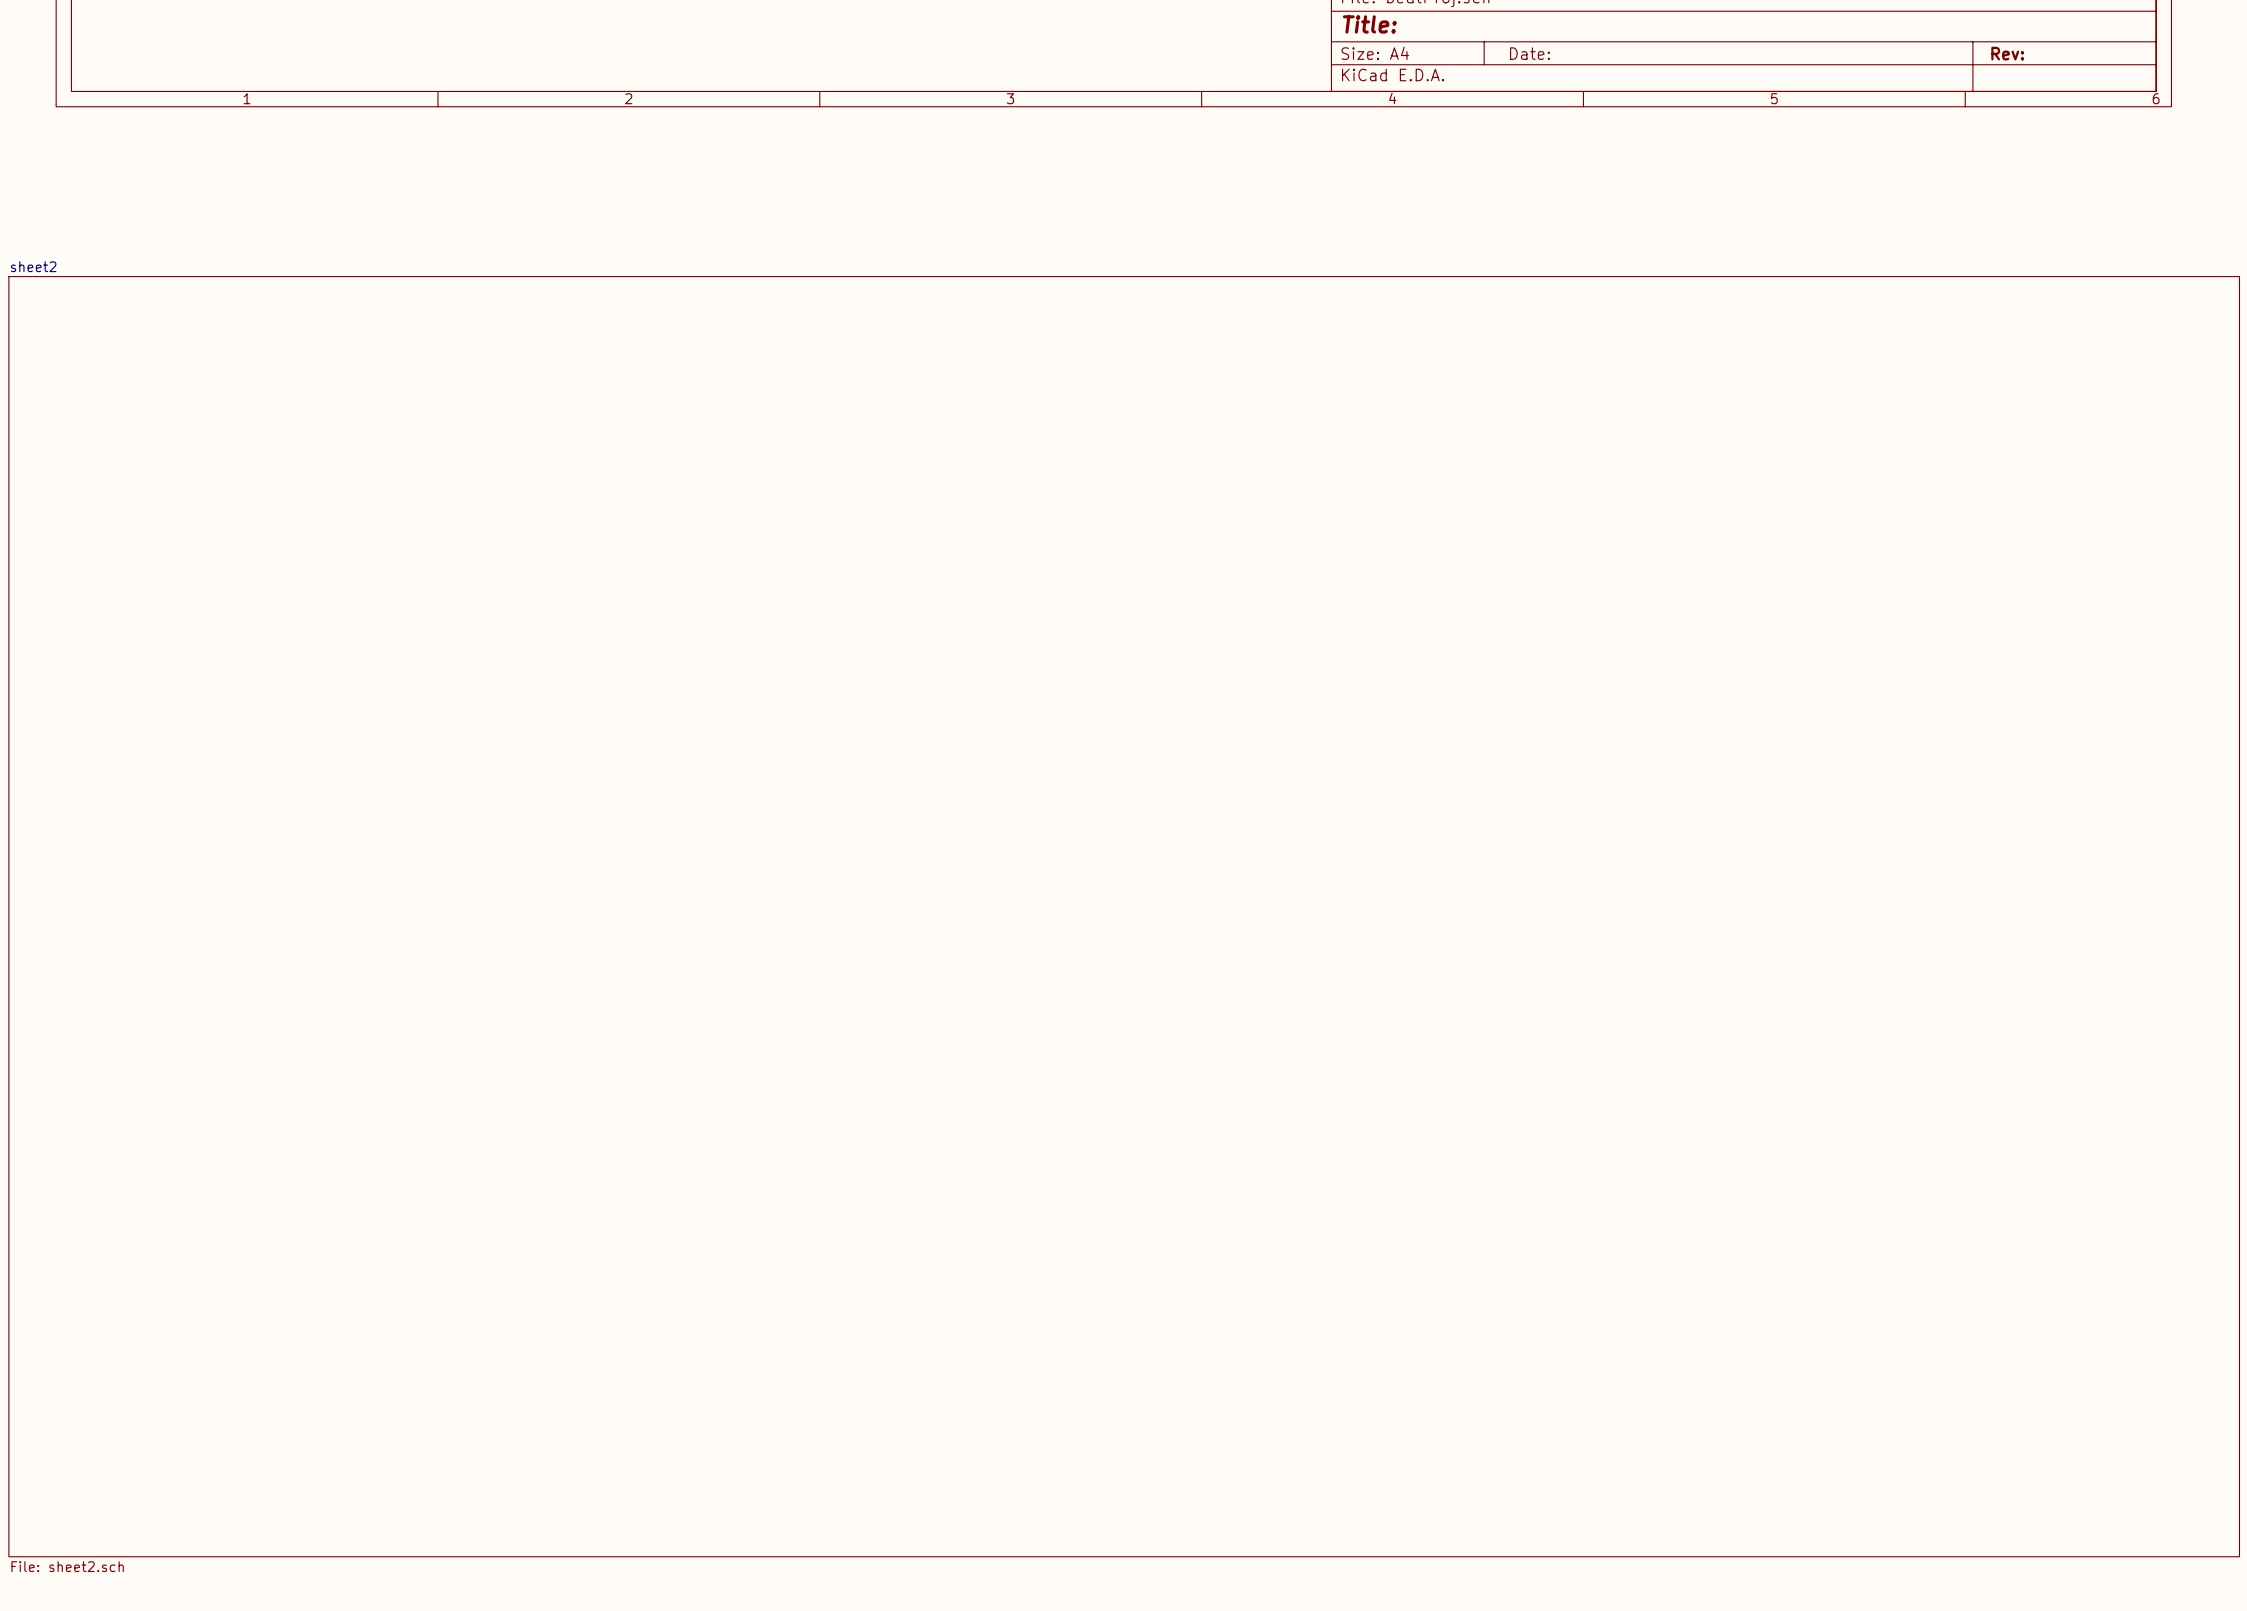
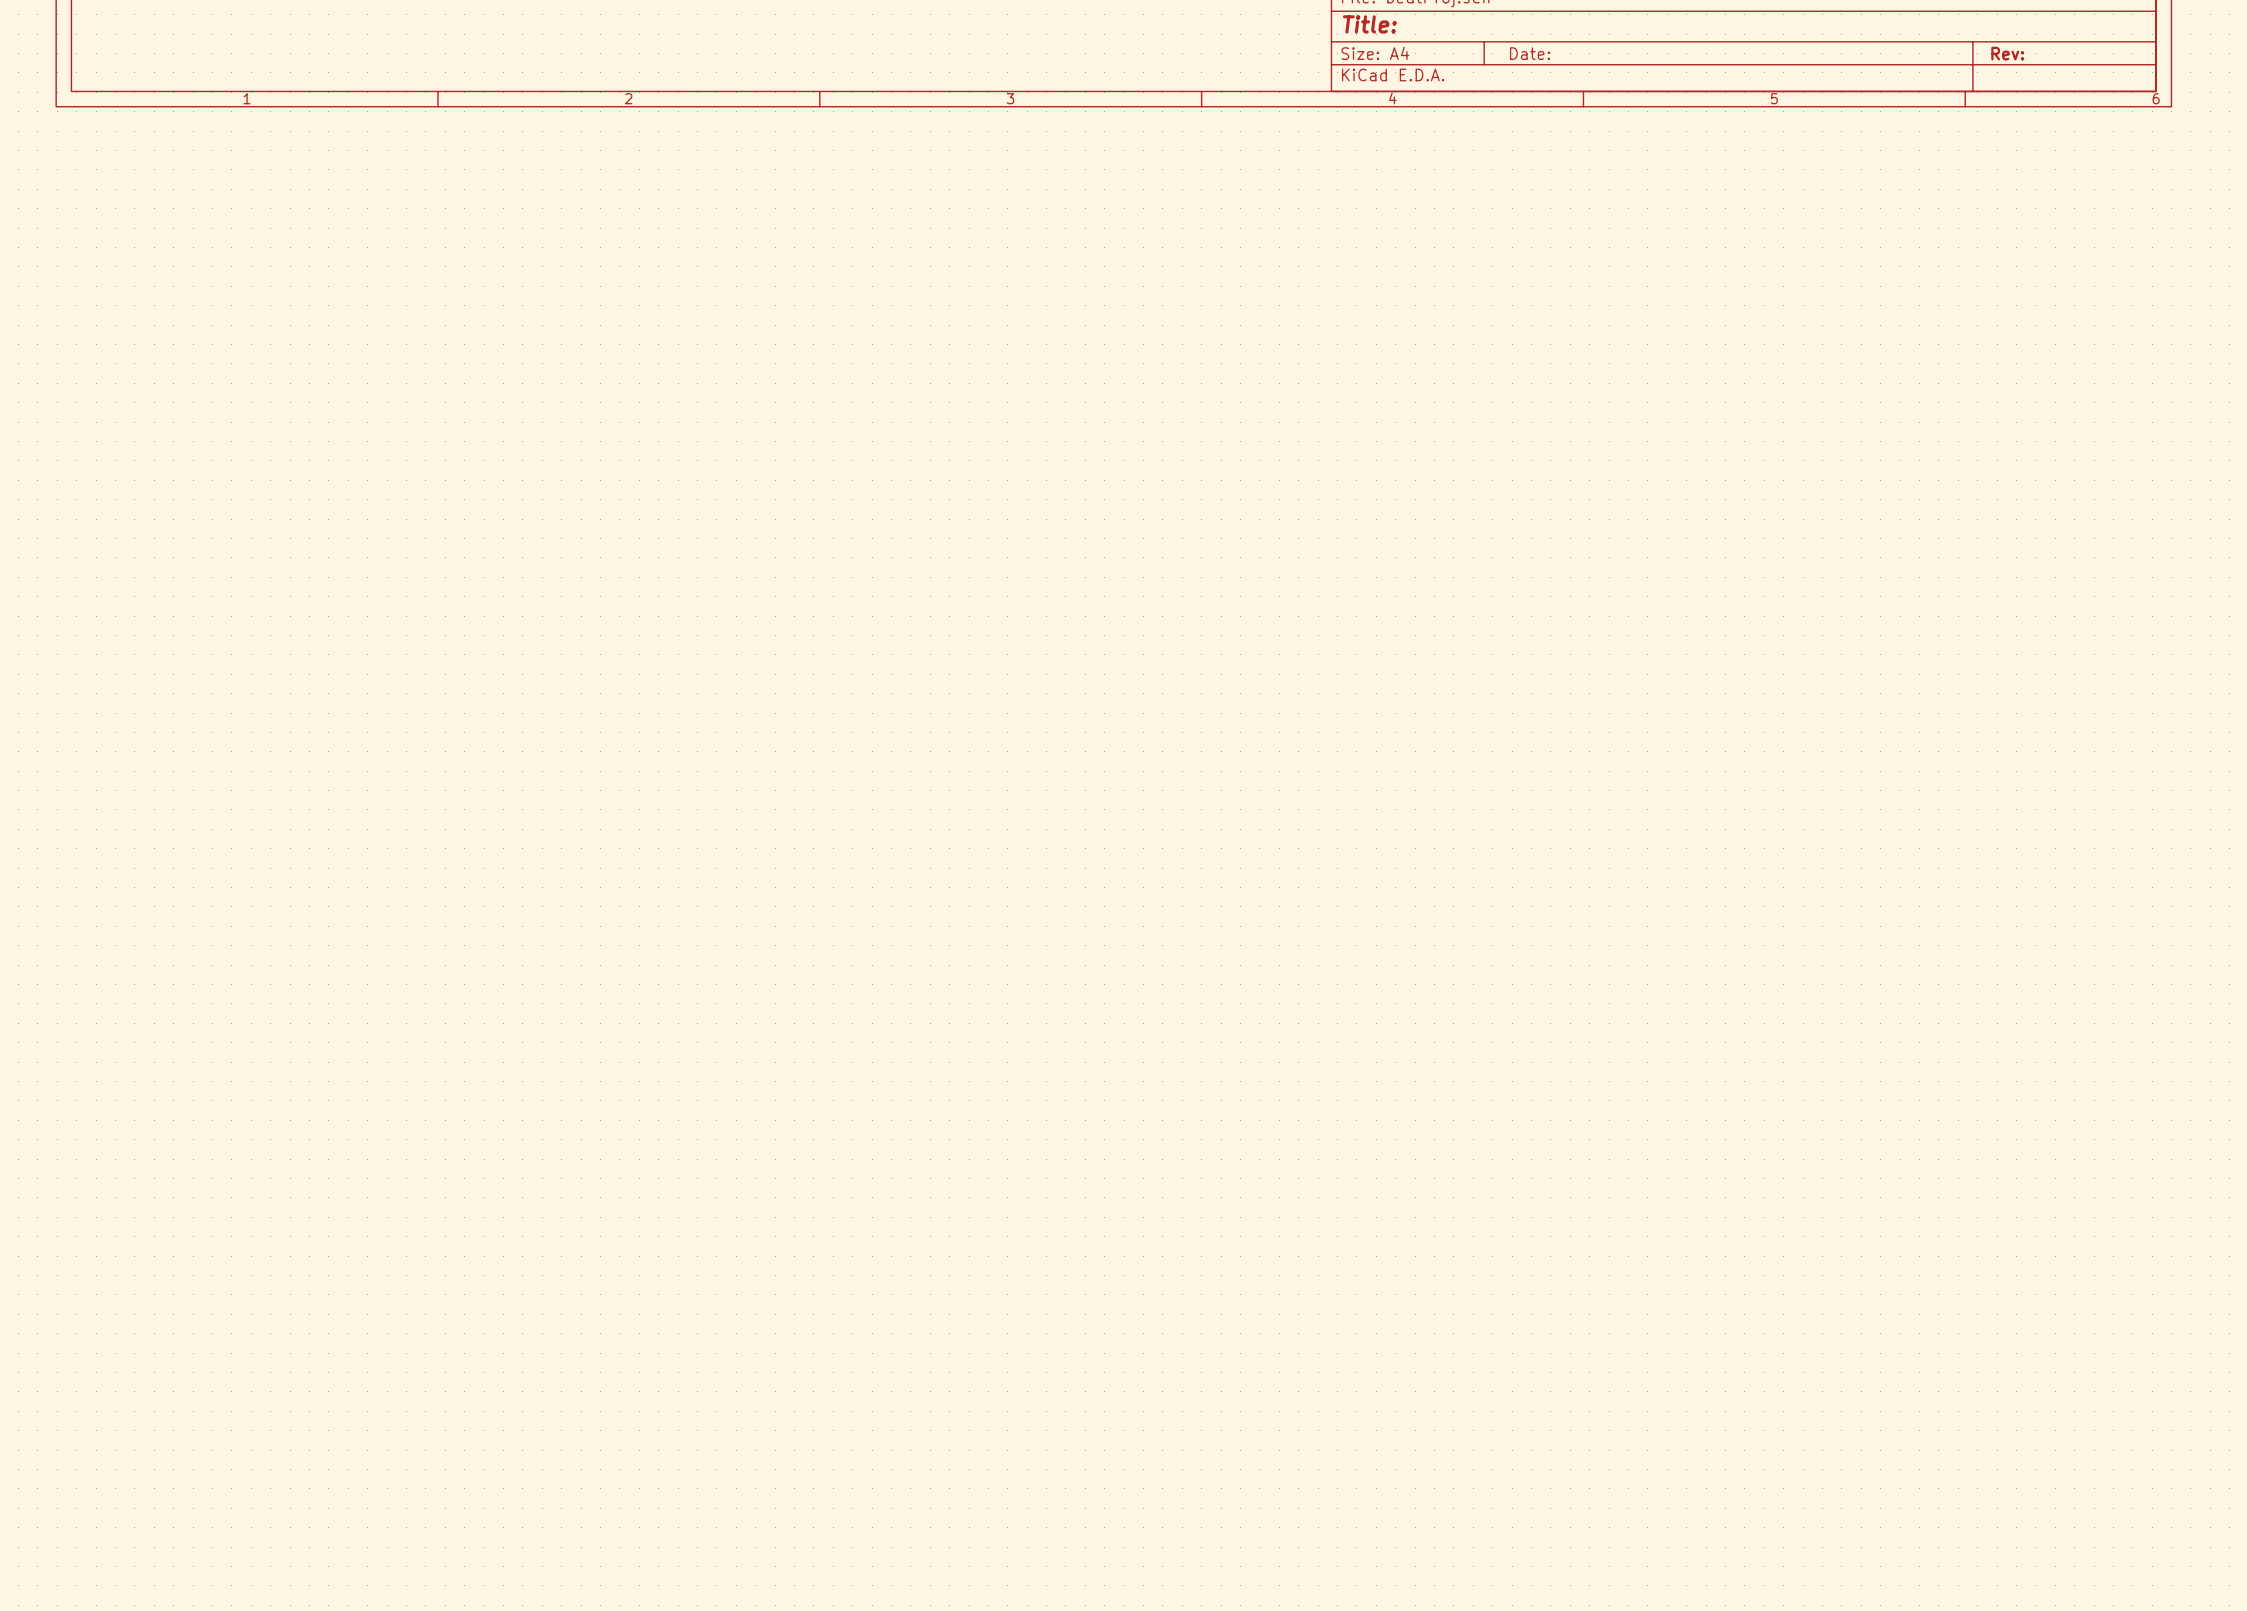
sheet sheet2: File: sheet2.sch (1124, 916) -> none

